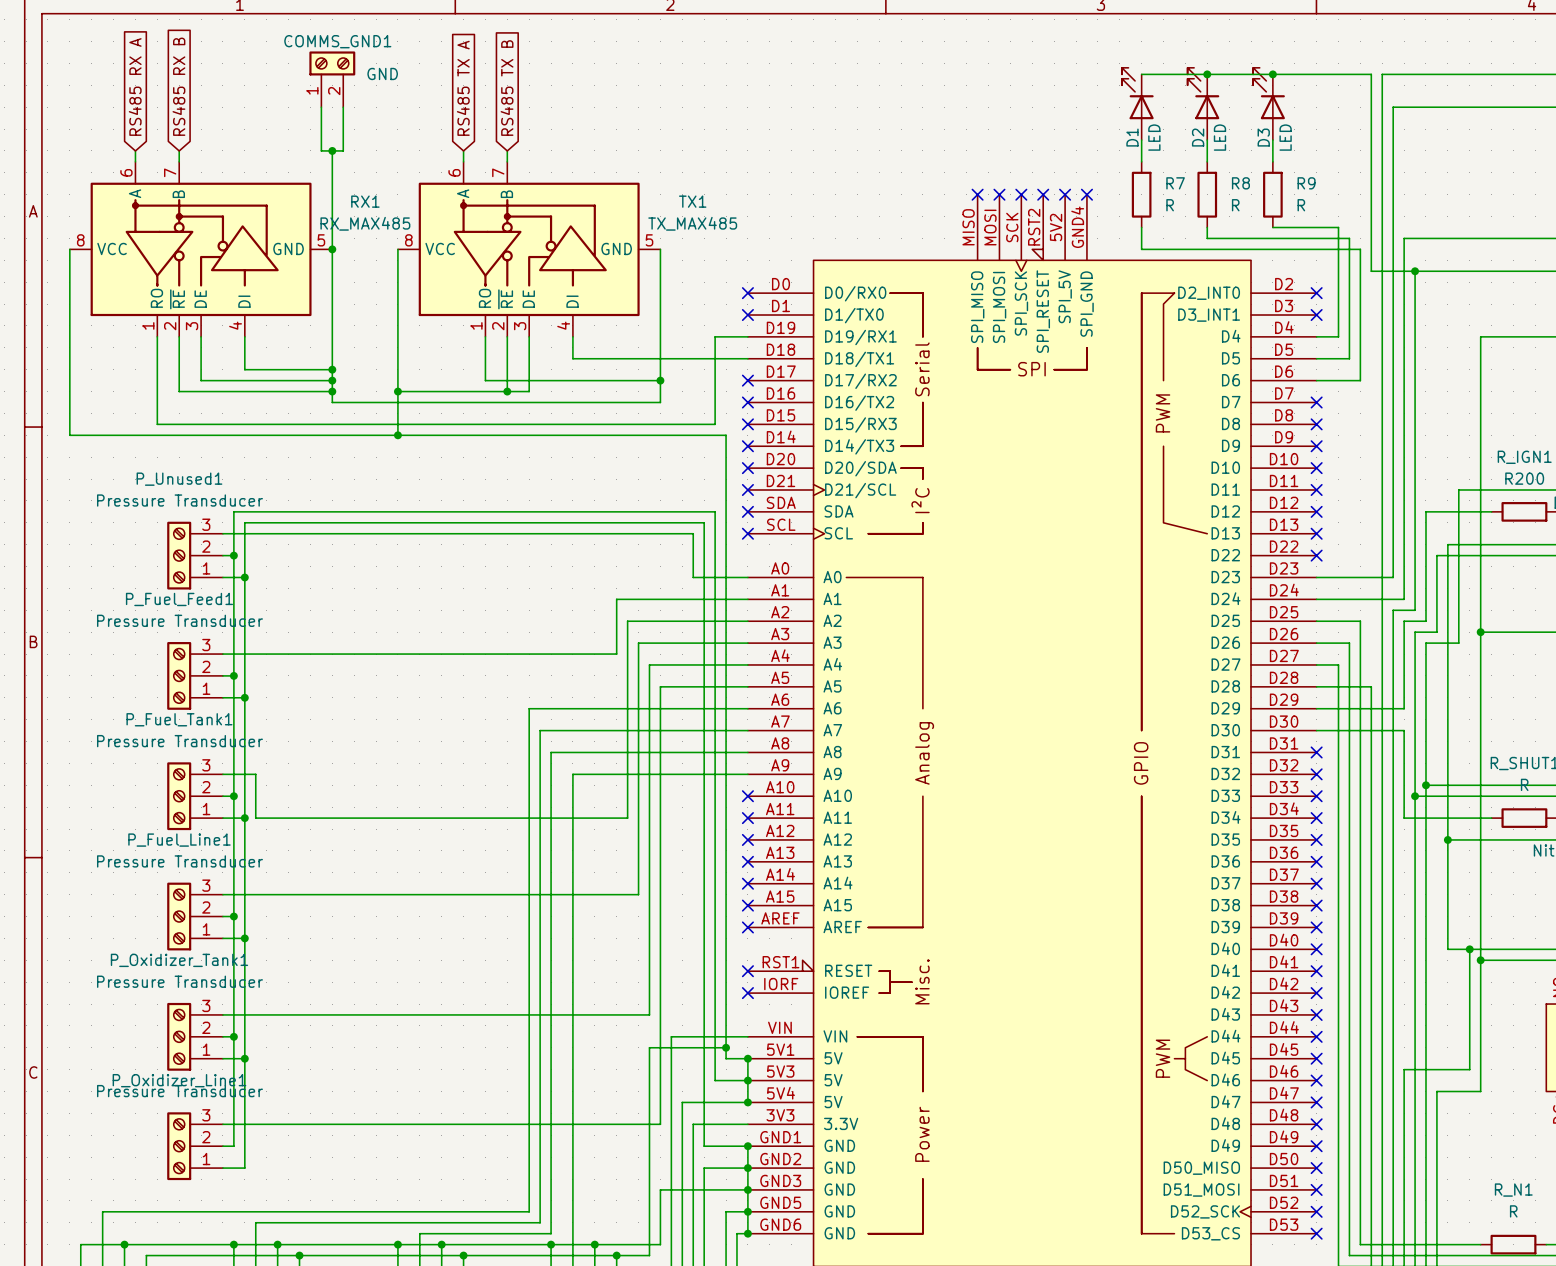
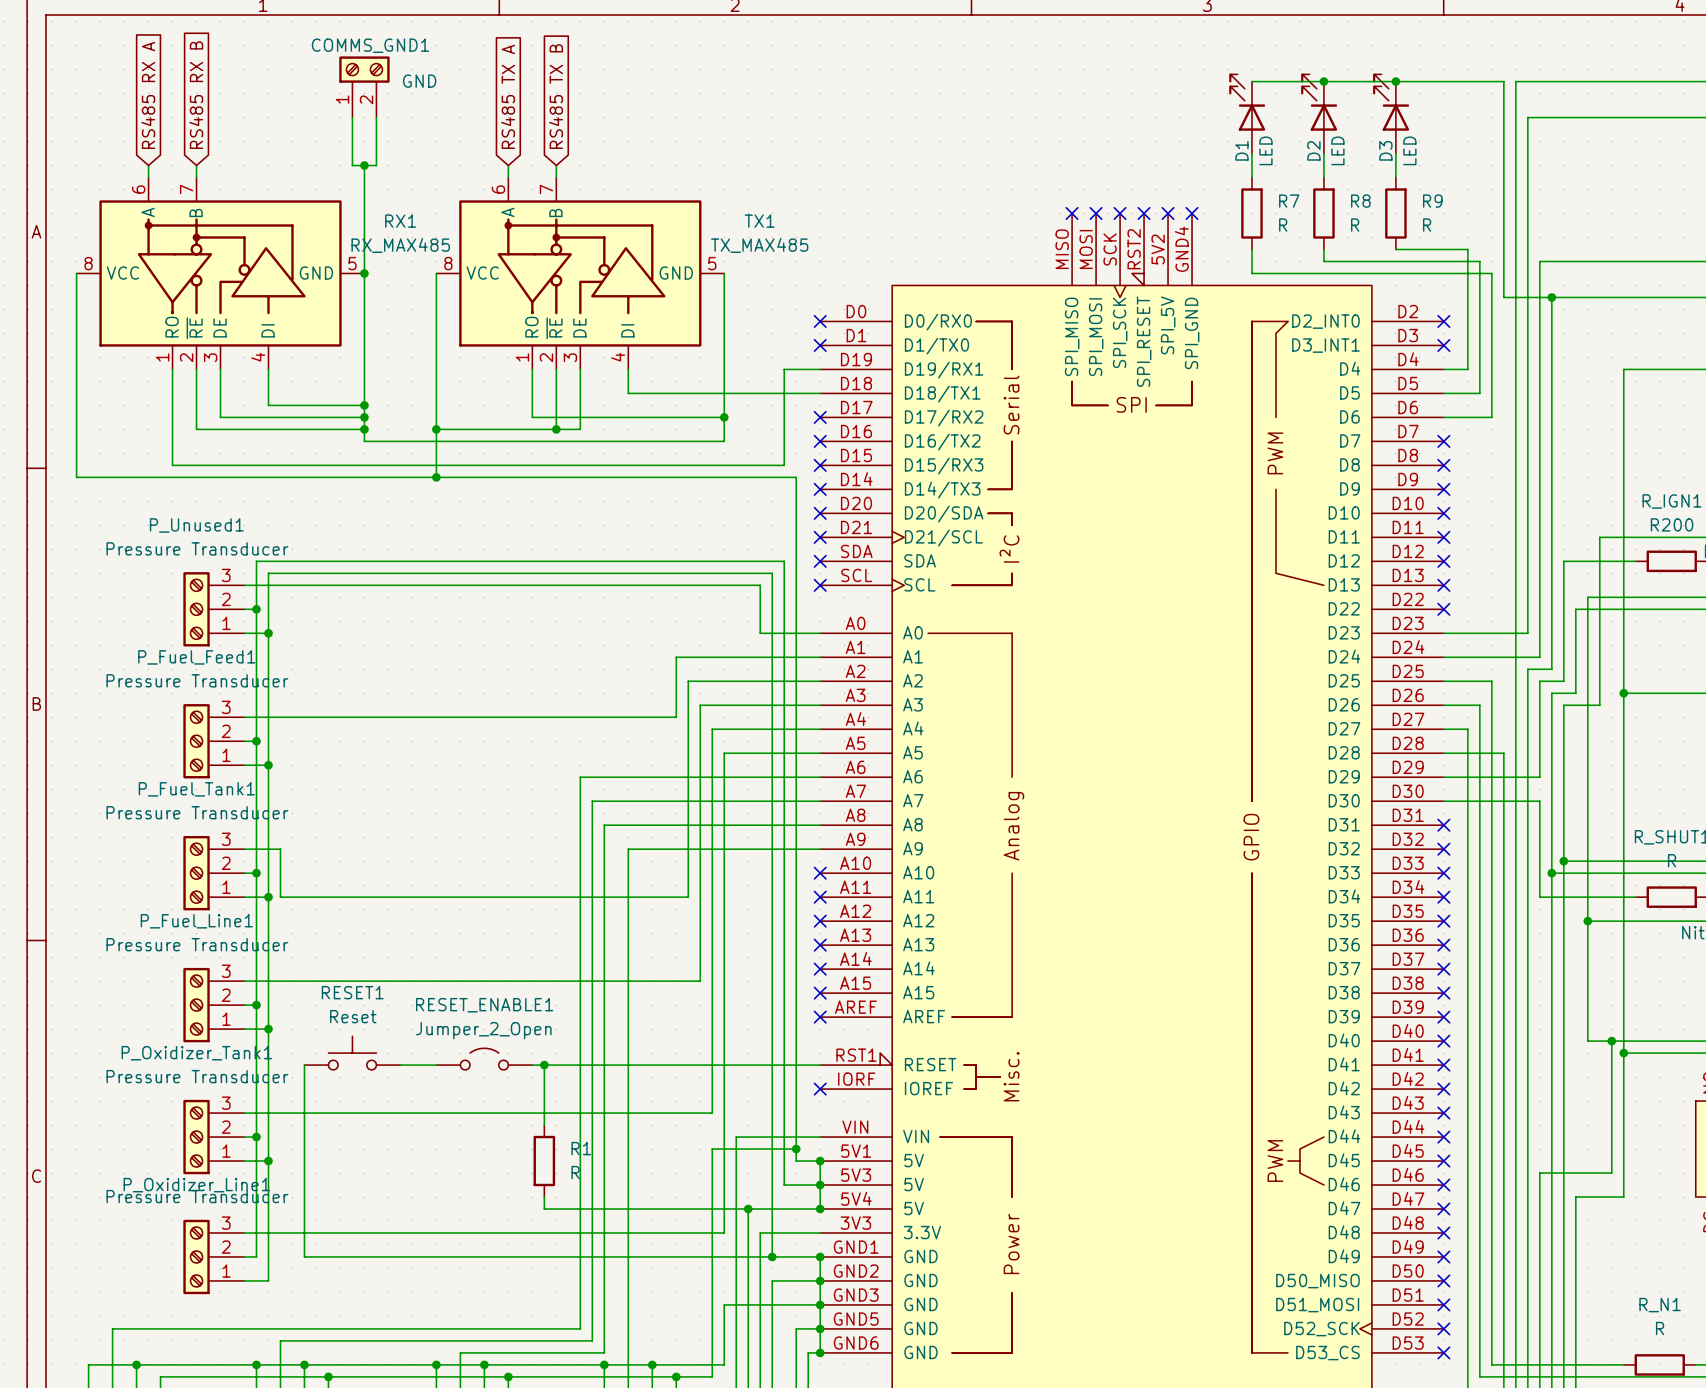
RESET1: none -> Reset (352, 1053)
RESET_ENABLE1: none -> Jumper_2_Open (484, 1059)
wire: none -> (304, 1065) (304, 1256) (772, 1256)
wire: none -> (400, 1065) (436, 1065)
wire: none -> (532, 1065) (820, 1065)
wire: none -> (544, 1065) (544, 1125)
junction: none -> (544, 1065)
no-connect mark: (747, 971) -> none
R1: none -> R (544, 1161)
wire: none -> (544, 1197) (544, 1209) (748, 1209)
junction: none -> (748, 1209)
junction: none -> (772, 1256)

